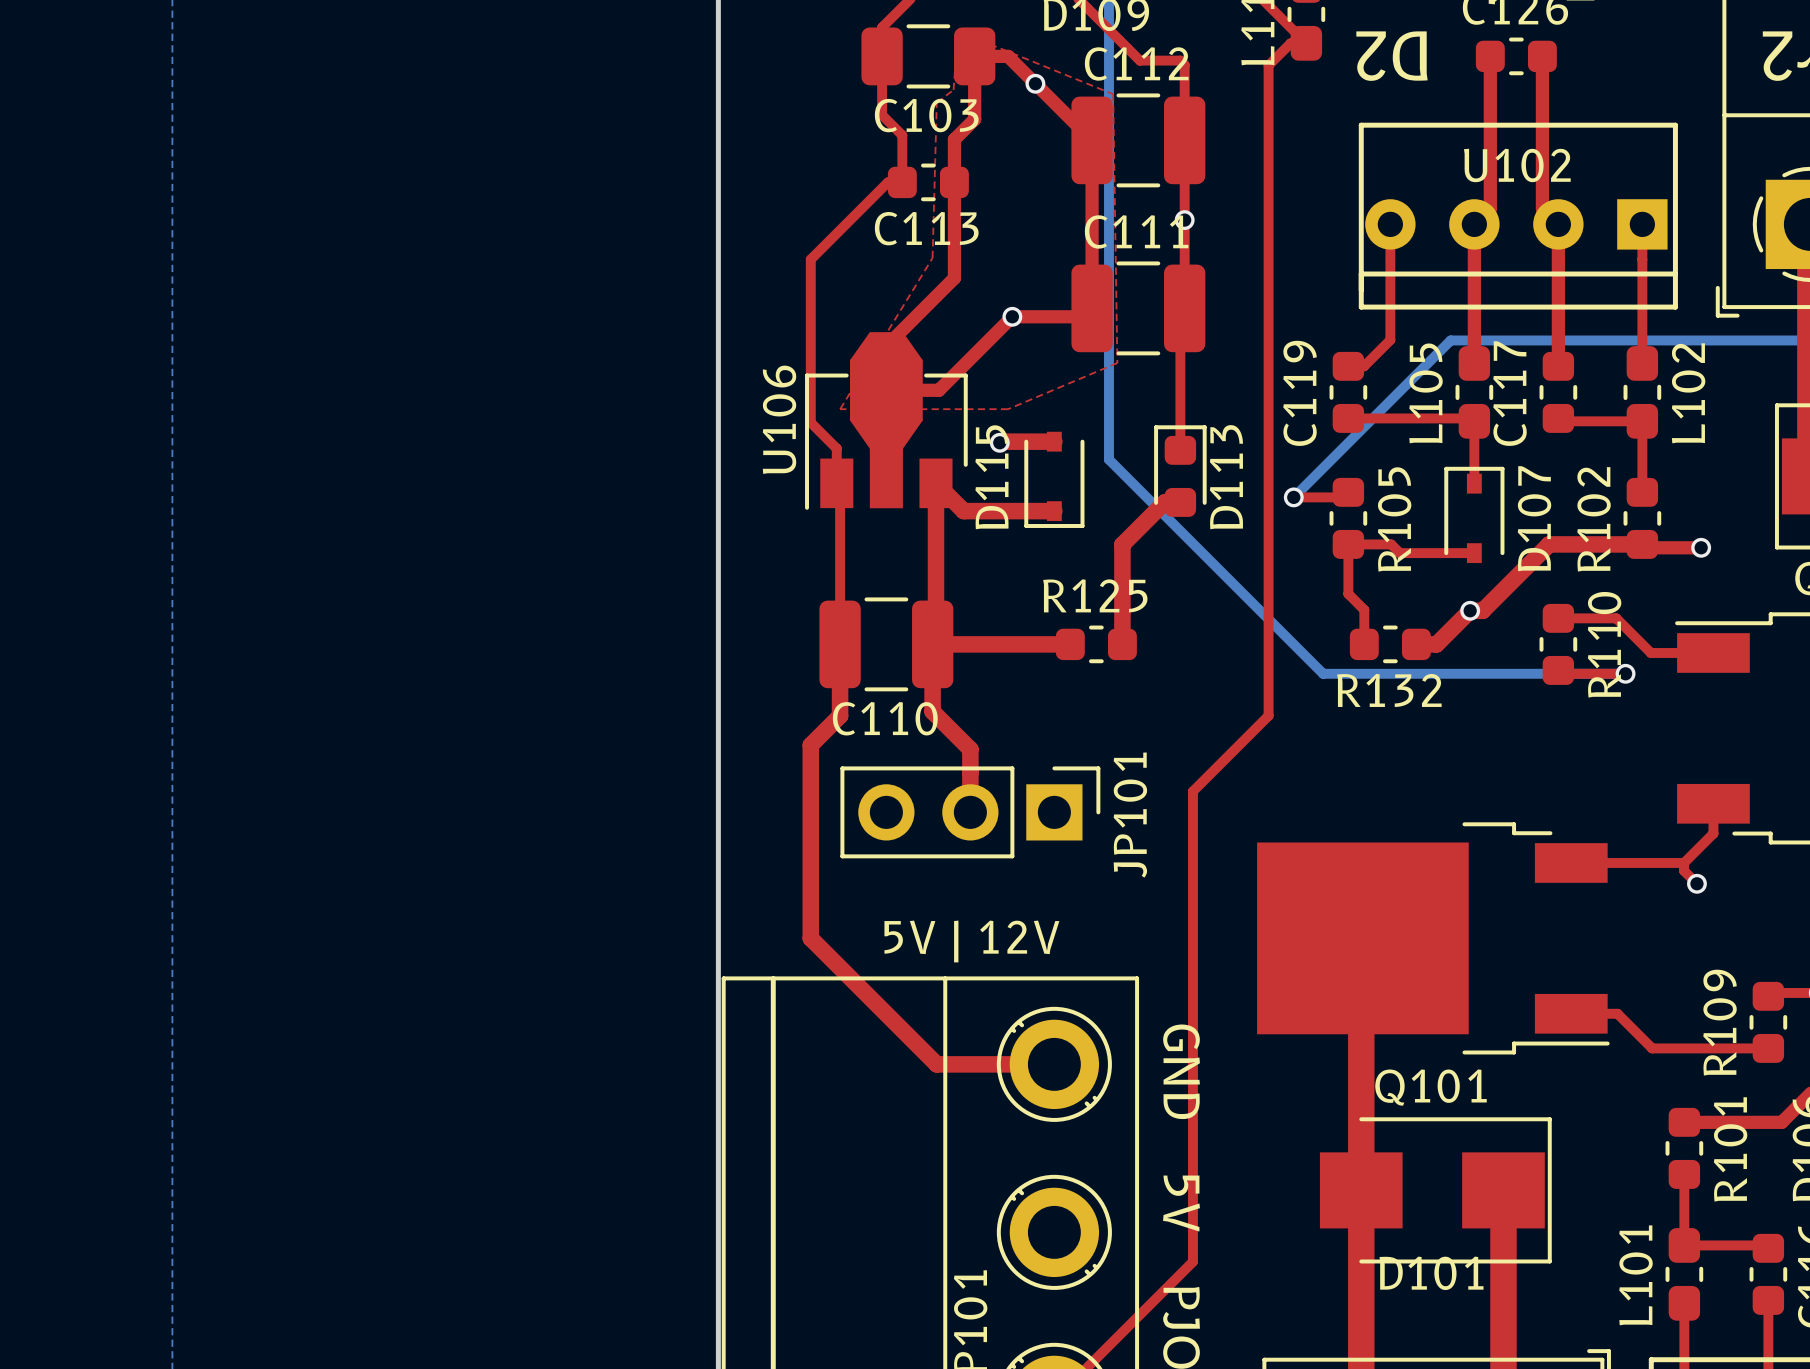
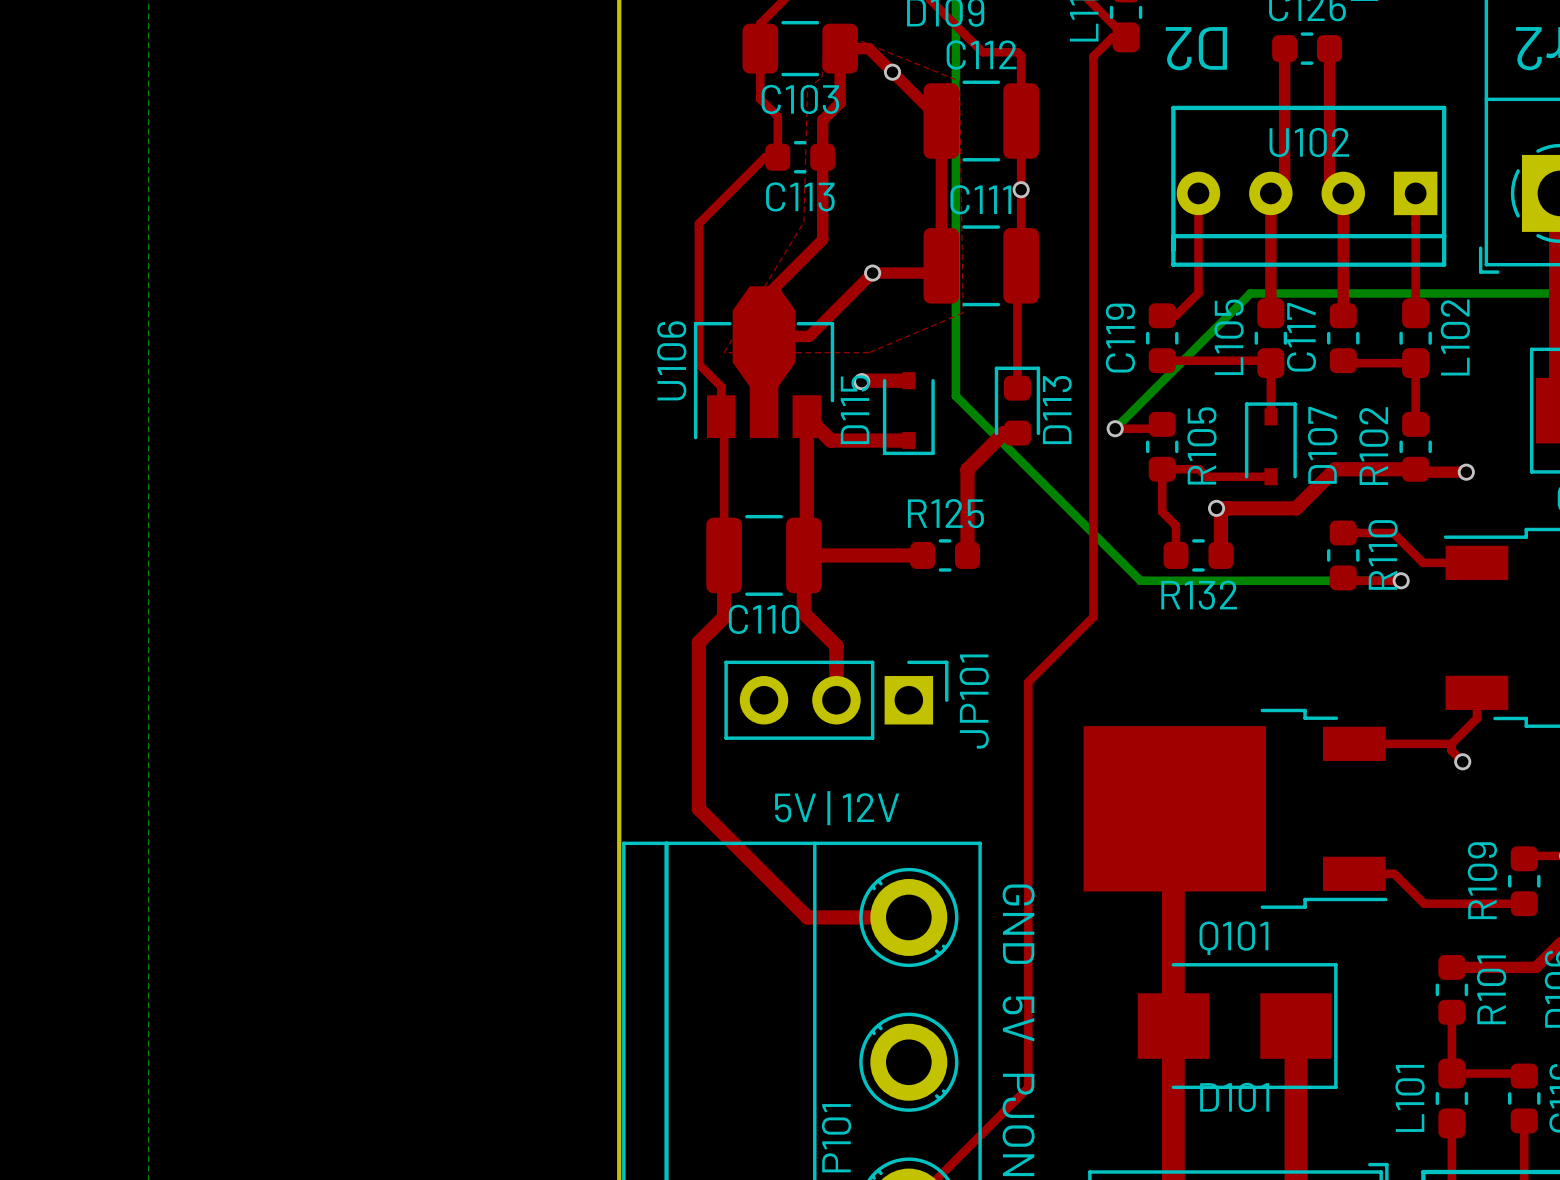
top track: (1503, 589) (1482, 610) (1470, 610) (1436, 644) (1416, 644) -> (1296, 508) (1216, 508) (1220, 512) (1220, 555)
via position: (1470, 610) -> (1216, 508)

